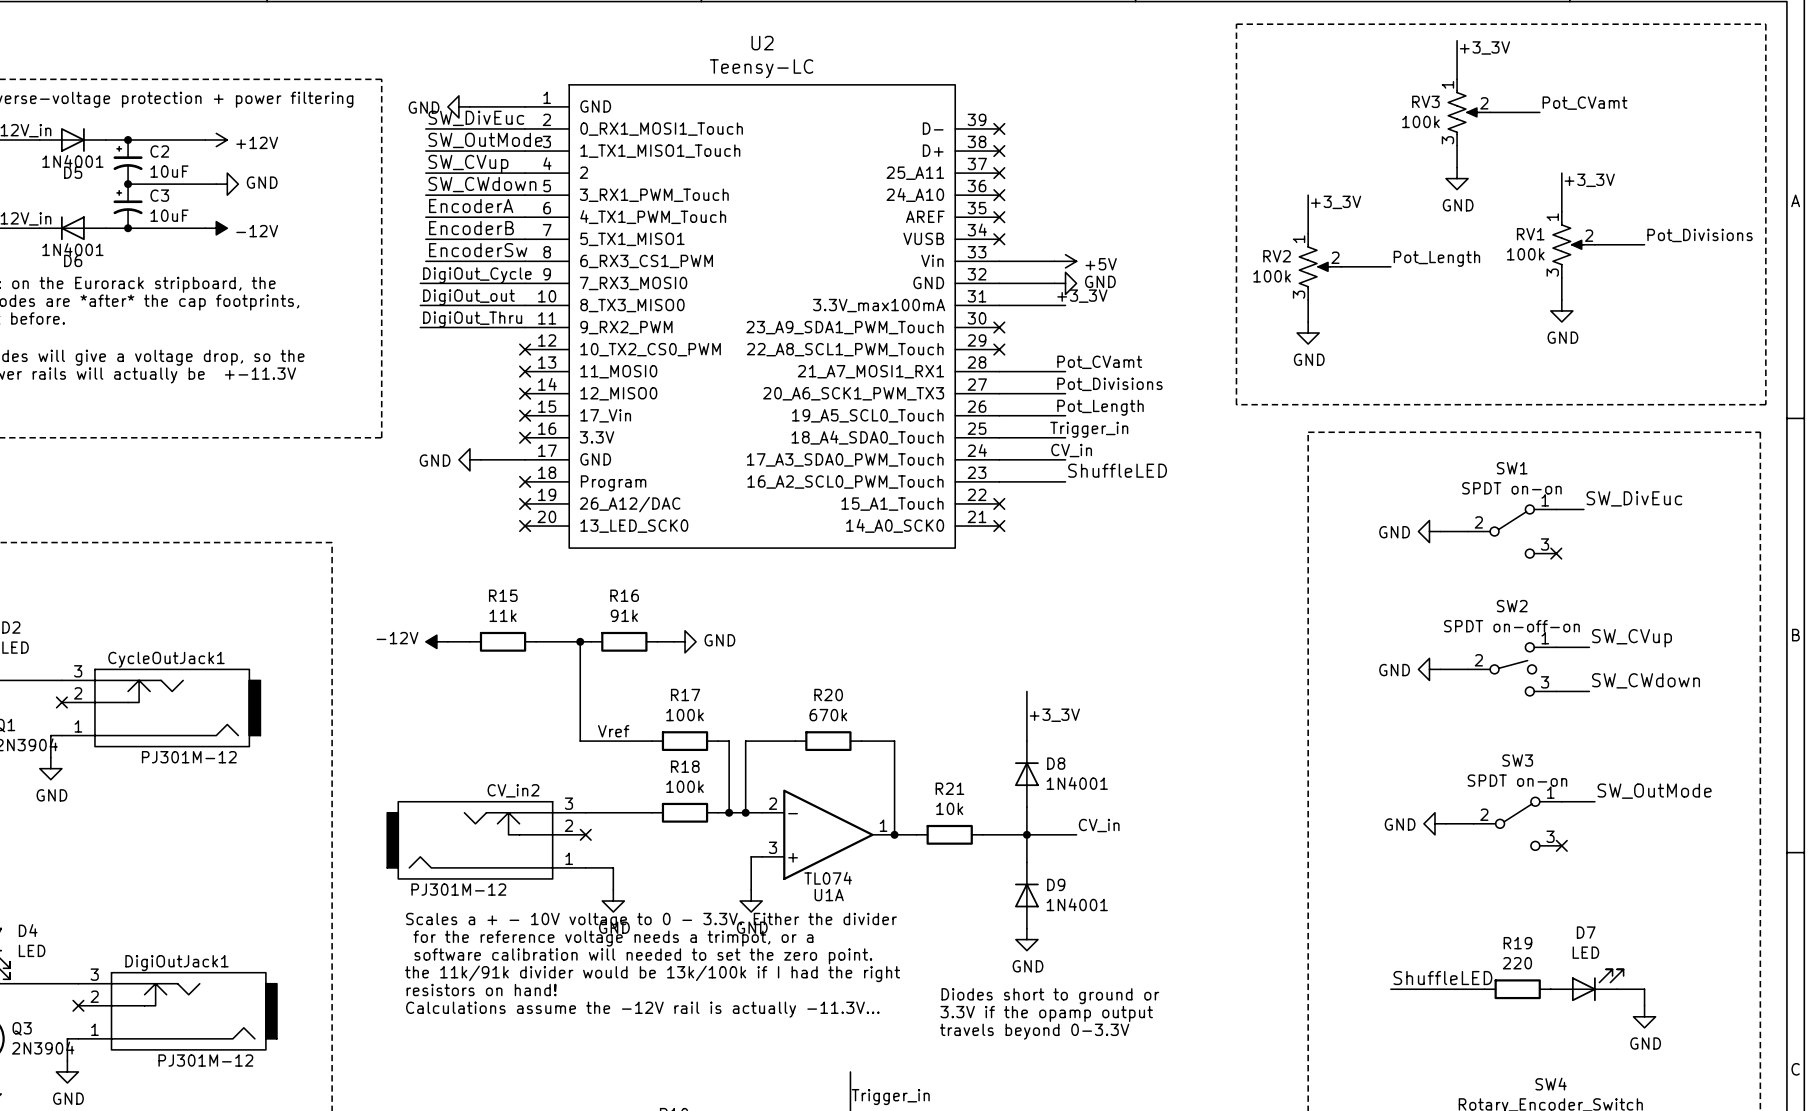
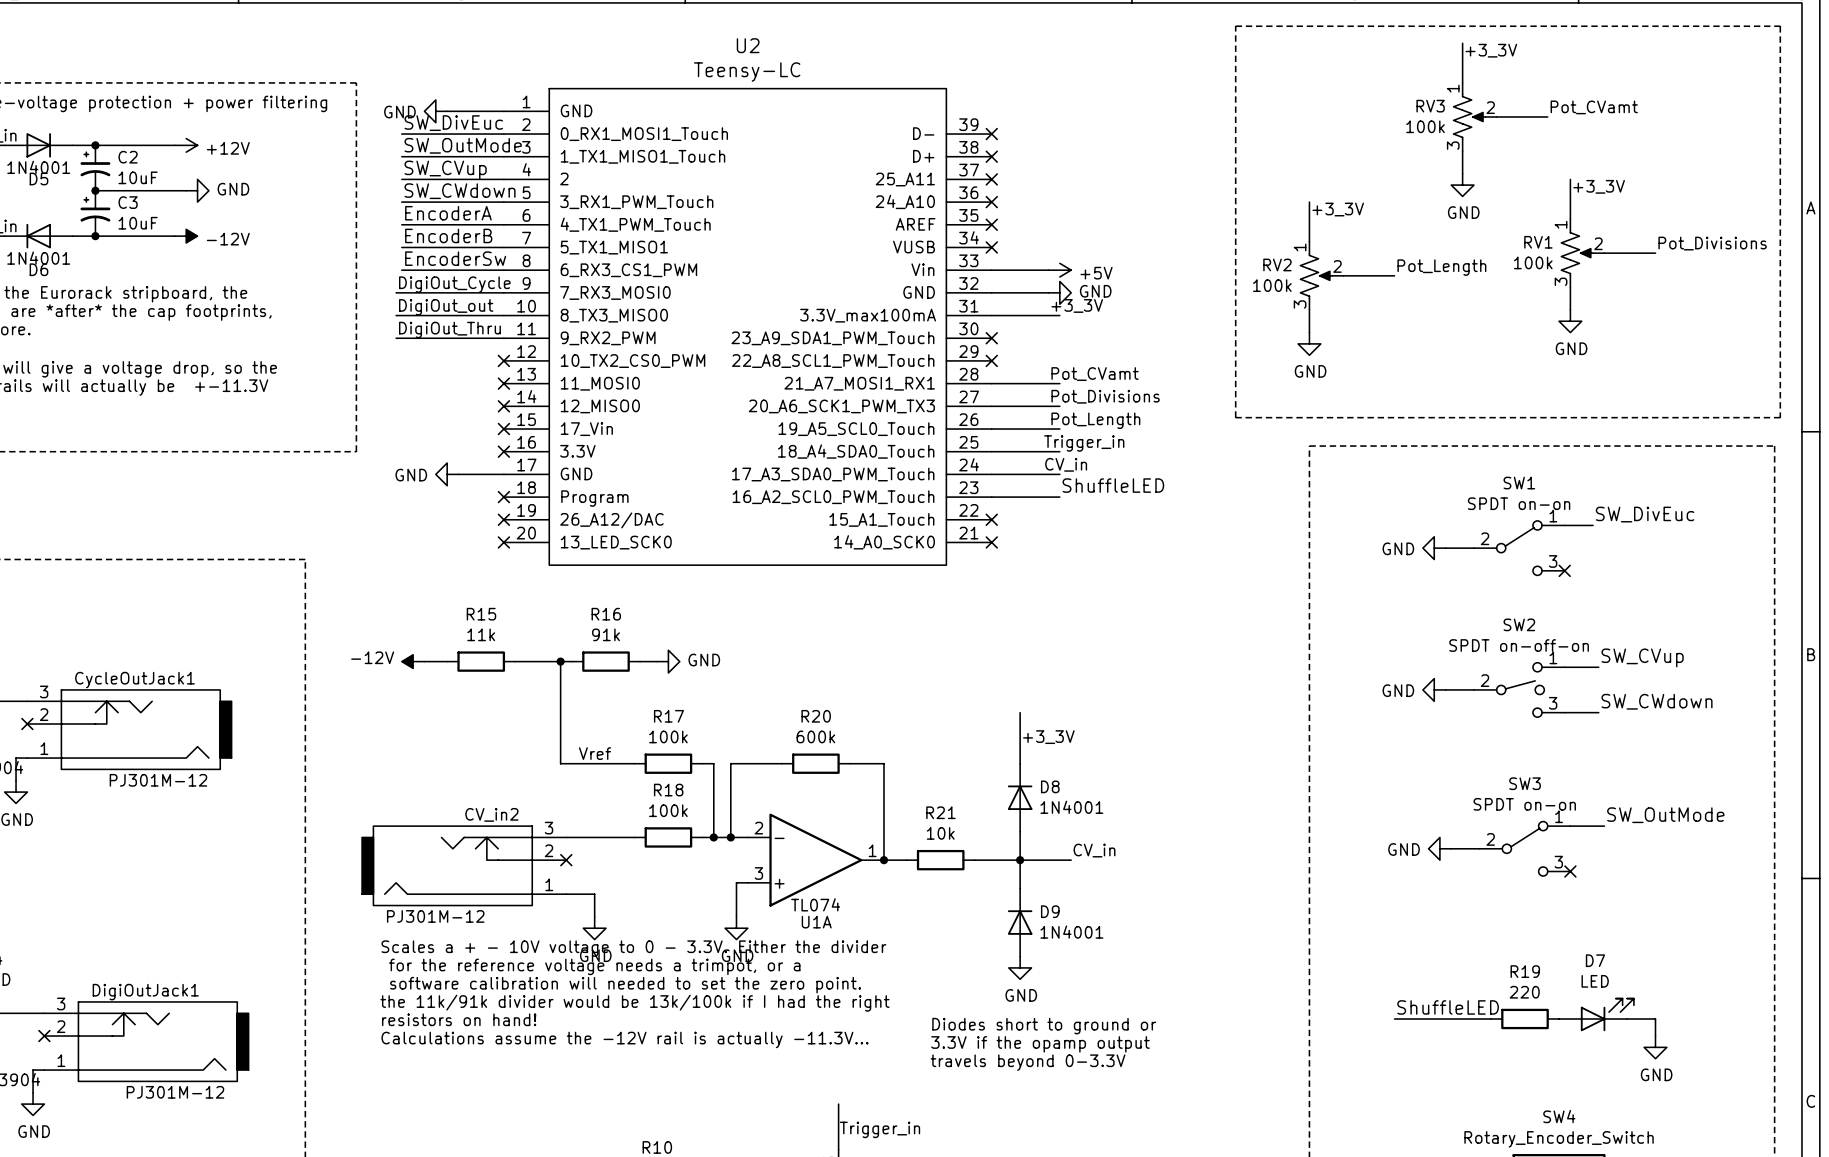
R20 value: 670k (828, 715) -> 600k (815, 736)

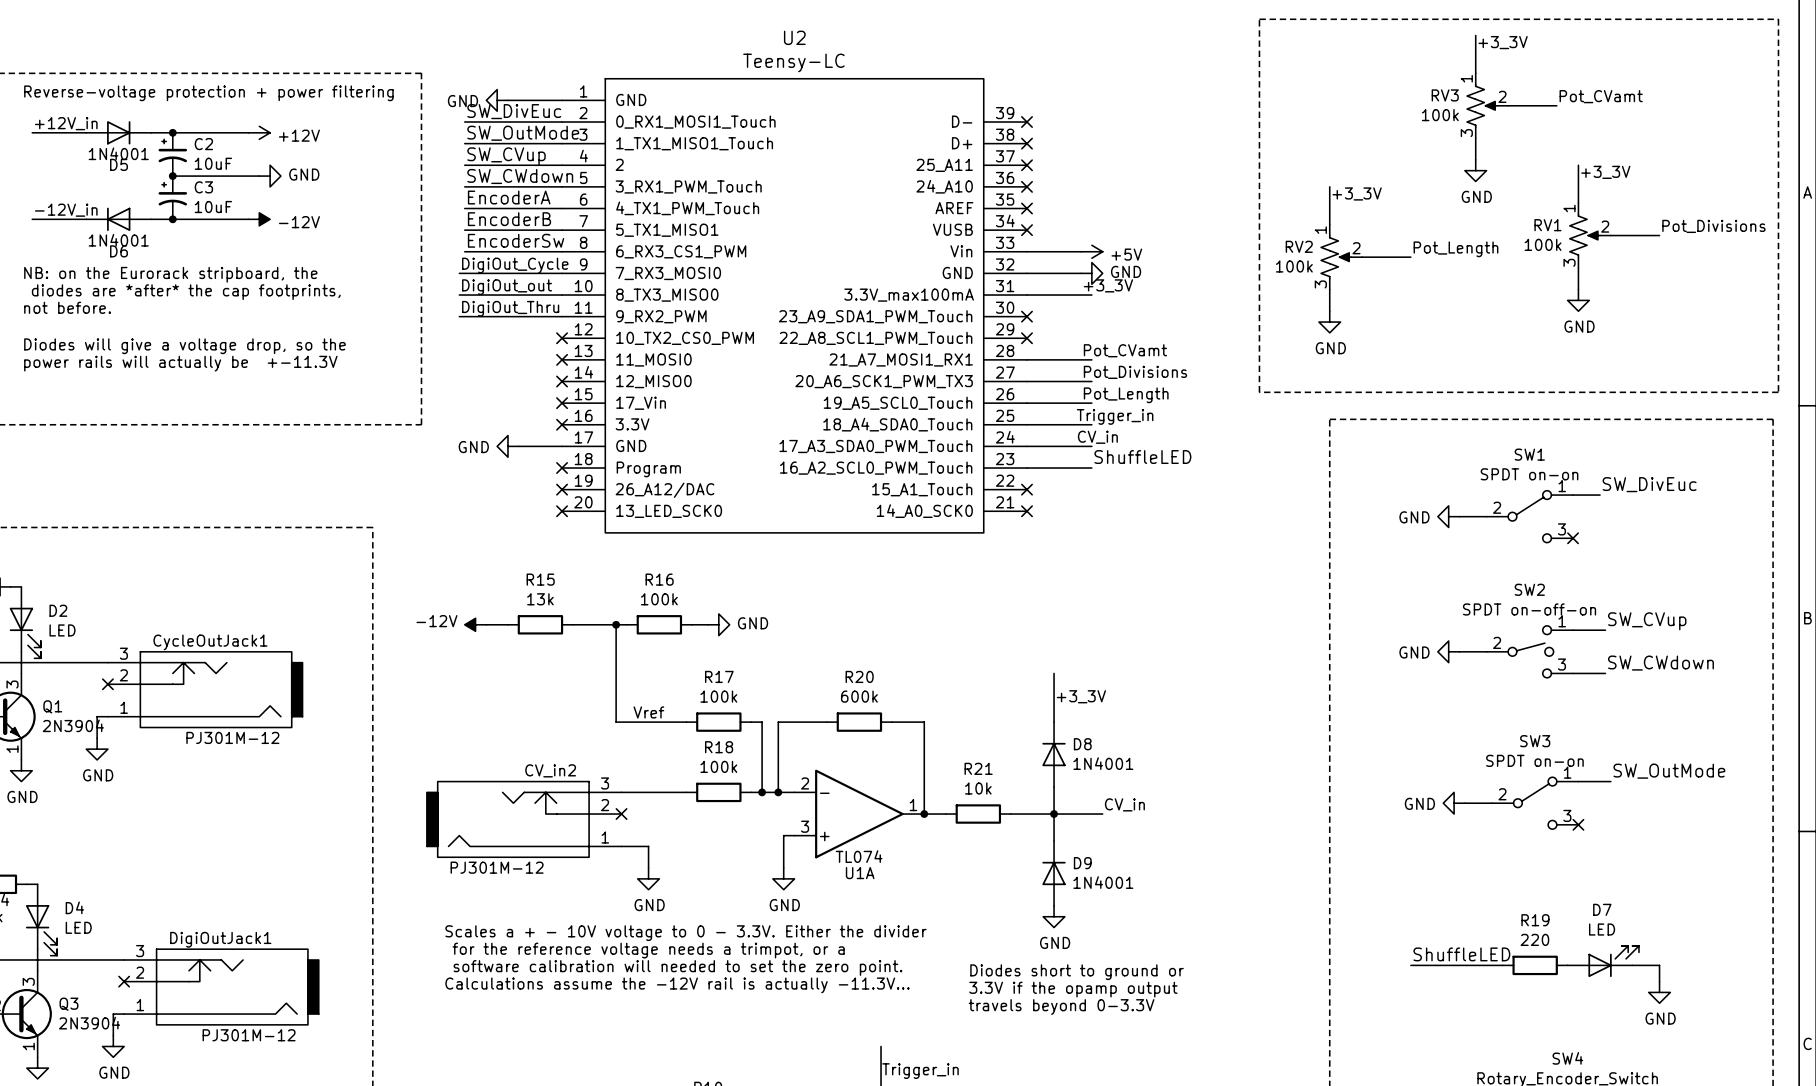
R15 value: 11k (481, 634) -> 13k (540, 599)
R16 value: 91k (606, 634) -> 100k (659, 599)
text: Scales a + - 10V voltage to 0 - 3.3V. Either the divider (633, 948) -> none
text: for the reference voltage needs a trimpot, or a (594, 966) -> none
text: software calibration will needed to set the zero point. (625, 985) -> Scales a + - 10V voltage to 0 - 3.3V. Either the divider (685, 933)
text: the 11k/91k divider would be 13k/100k if I had the right (634, 1003) -> for the reference voltage needs a trimpot, or a (648, 950)
text: resistors on hand! (459, 1019) -> software calibration will needed to set the zero point. (677, 967)

